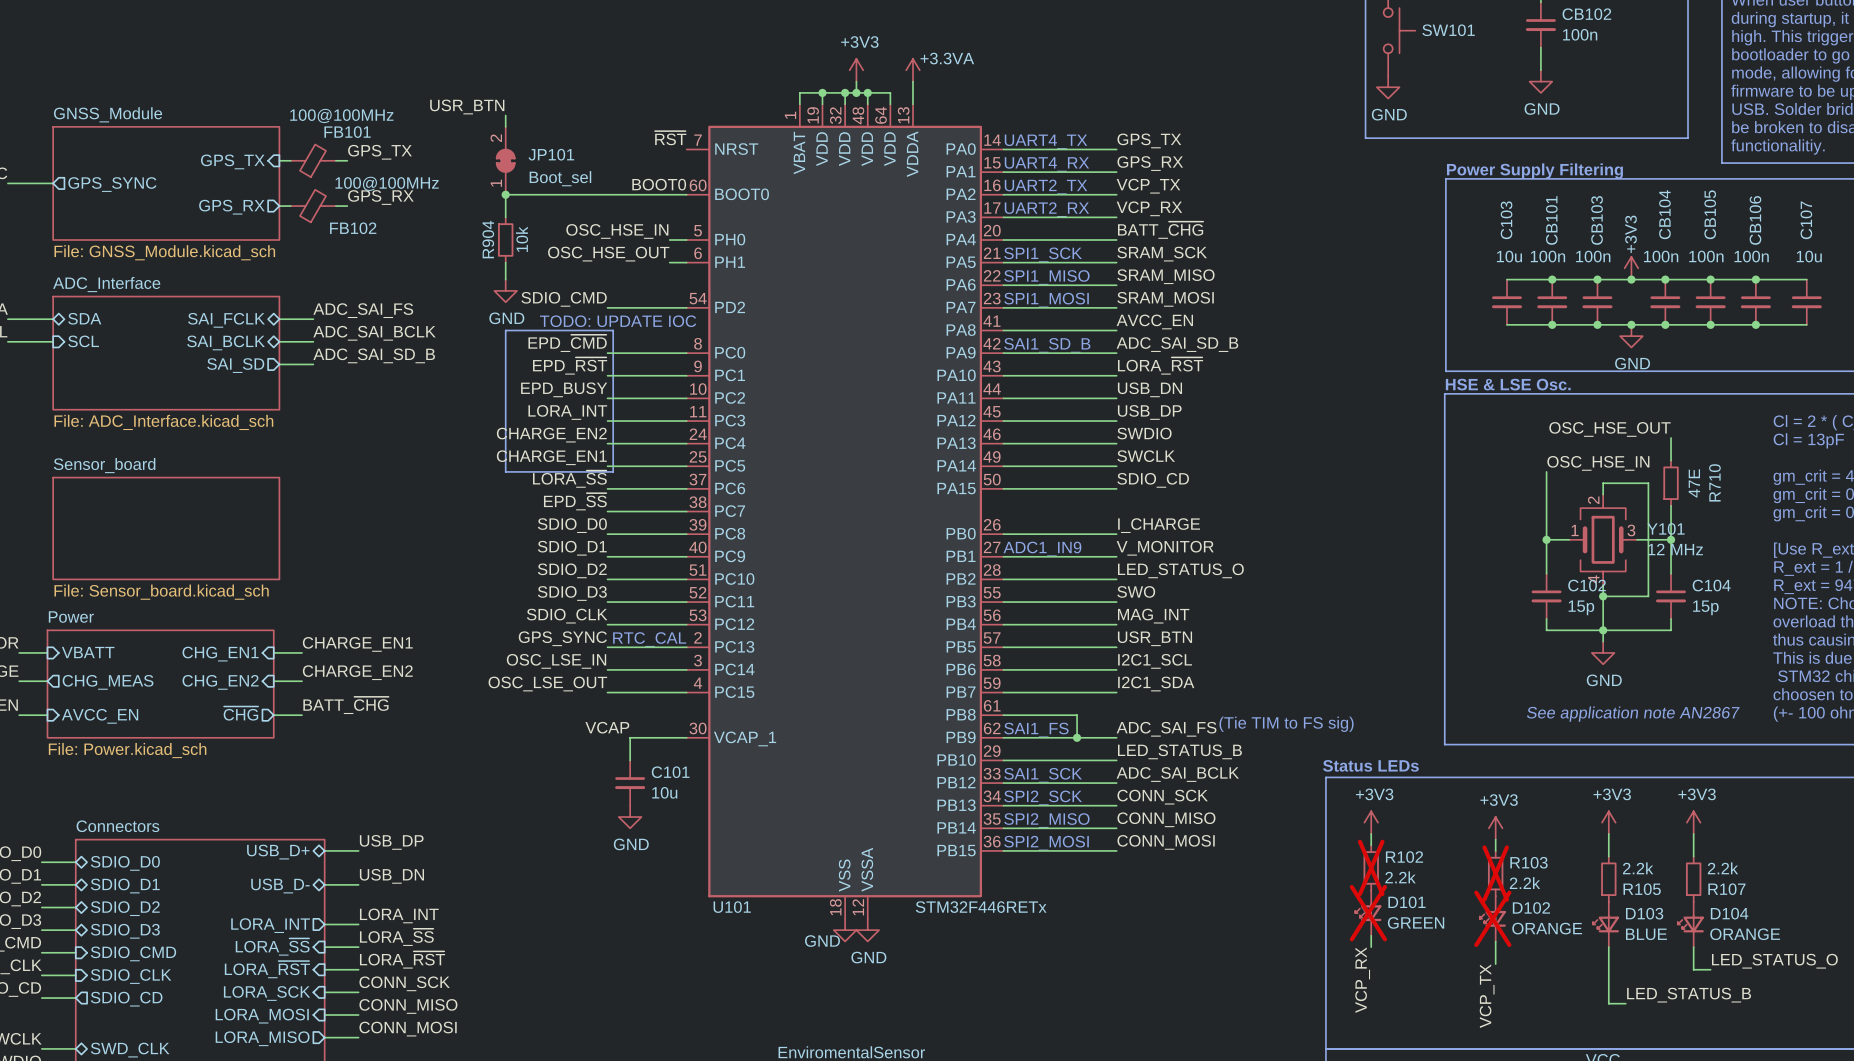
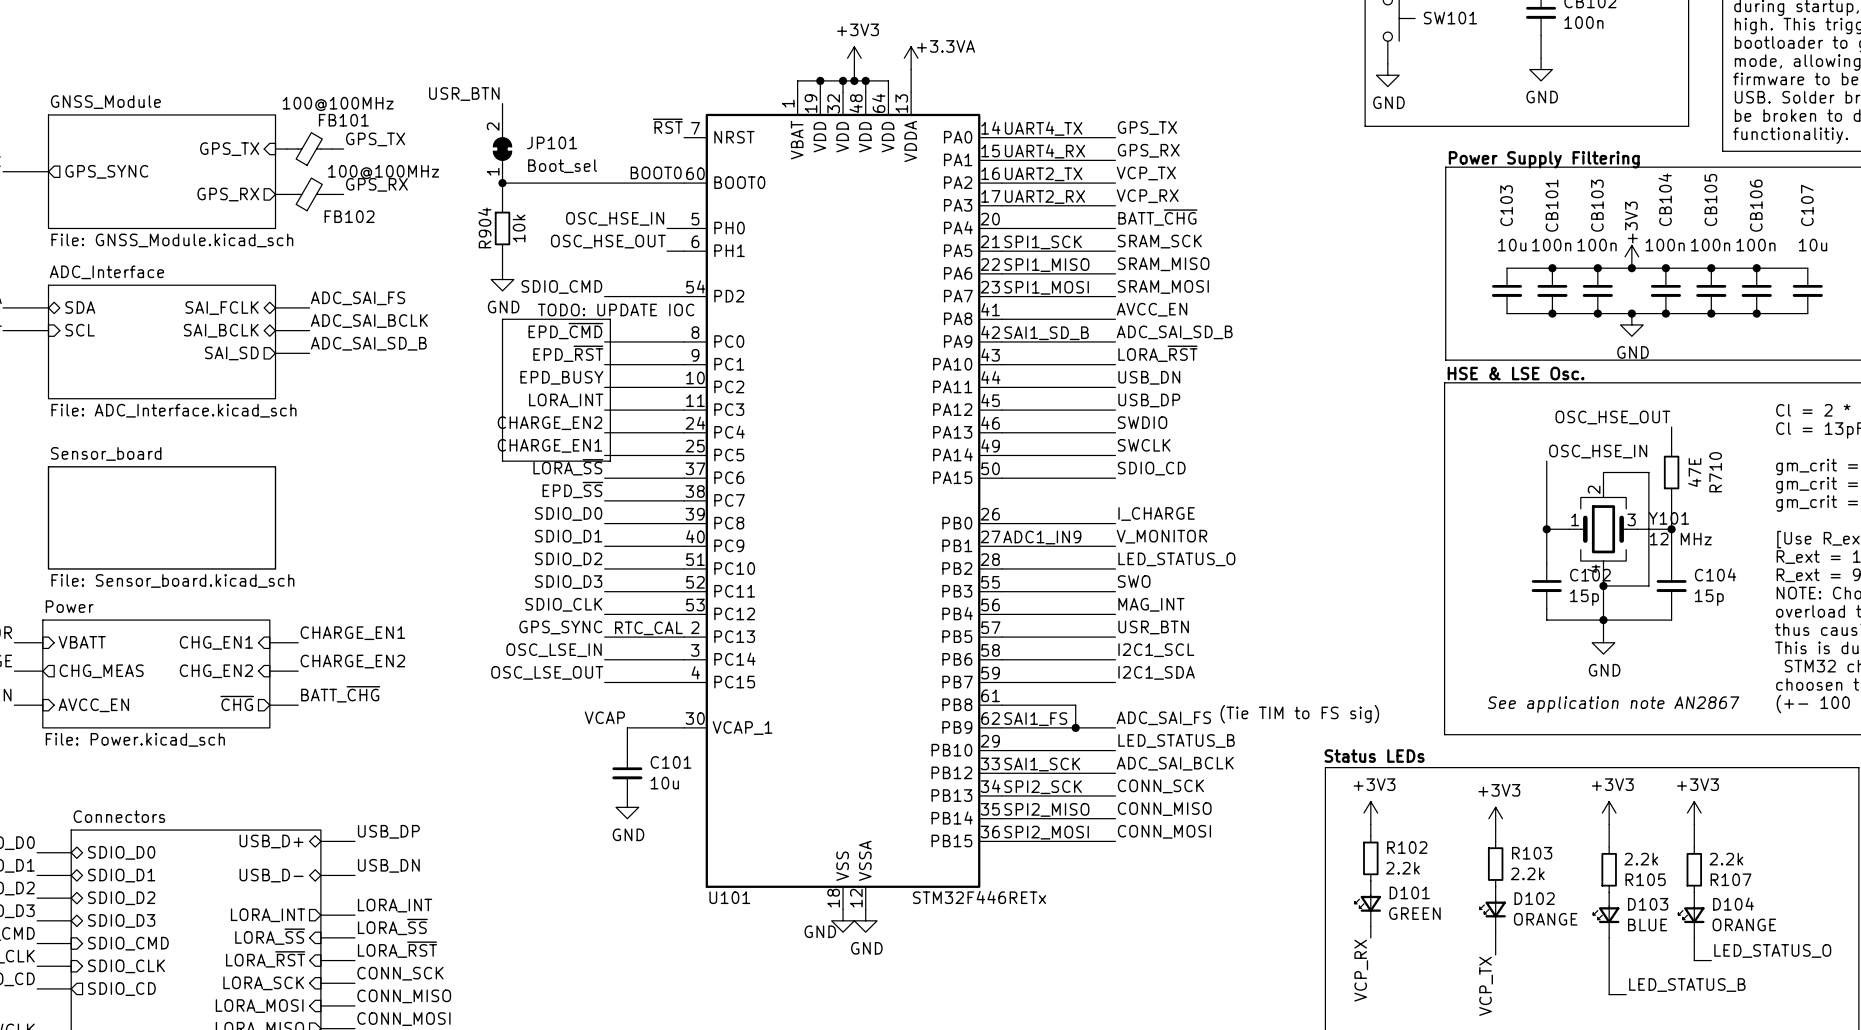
R102 do-not-place cross: (1371, 867) -> none
R103 do-not-place cross: (1495, 873) -> none
D101 do-not-place cross: (1368, 913) -> none
D102 do-not-place cross: (1492, 918) -> none

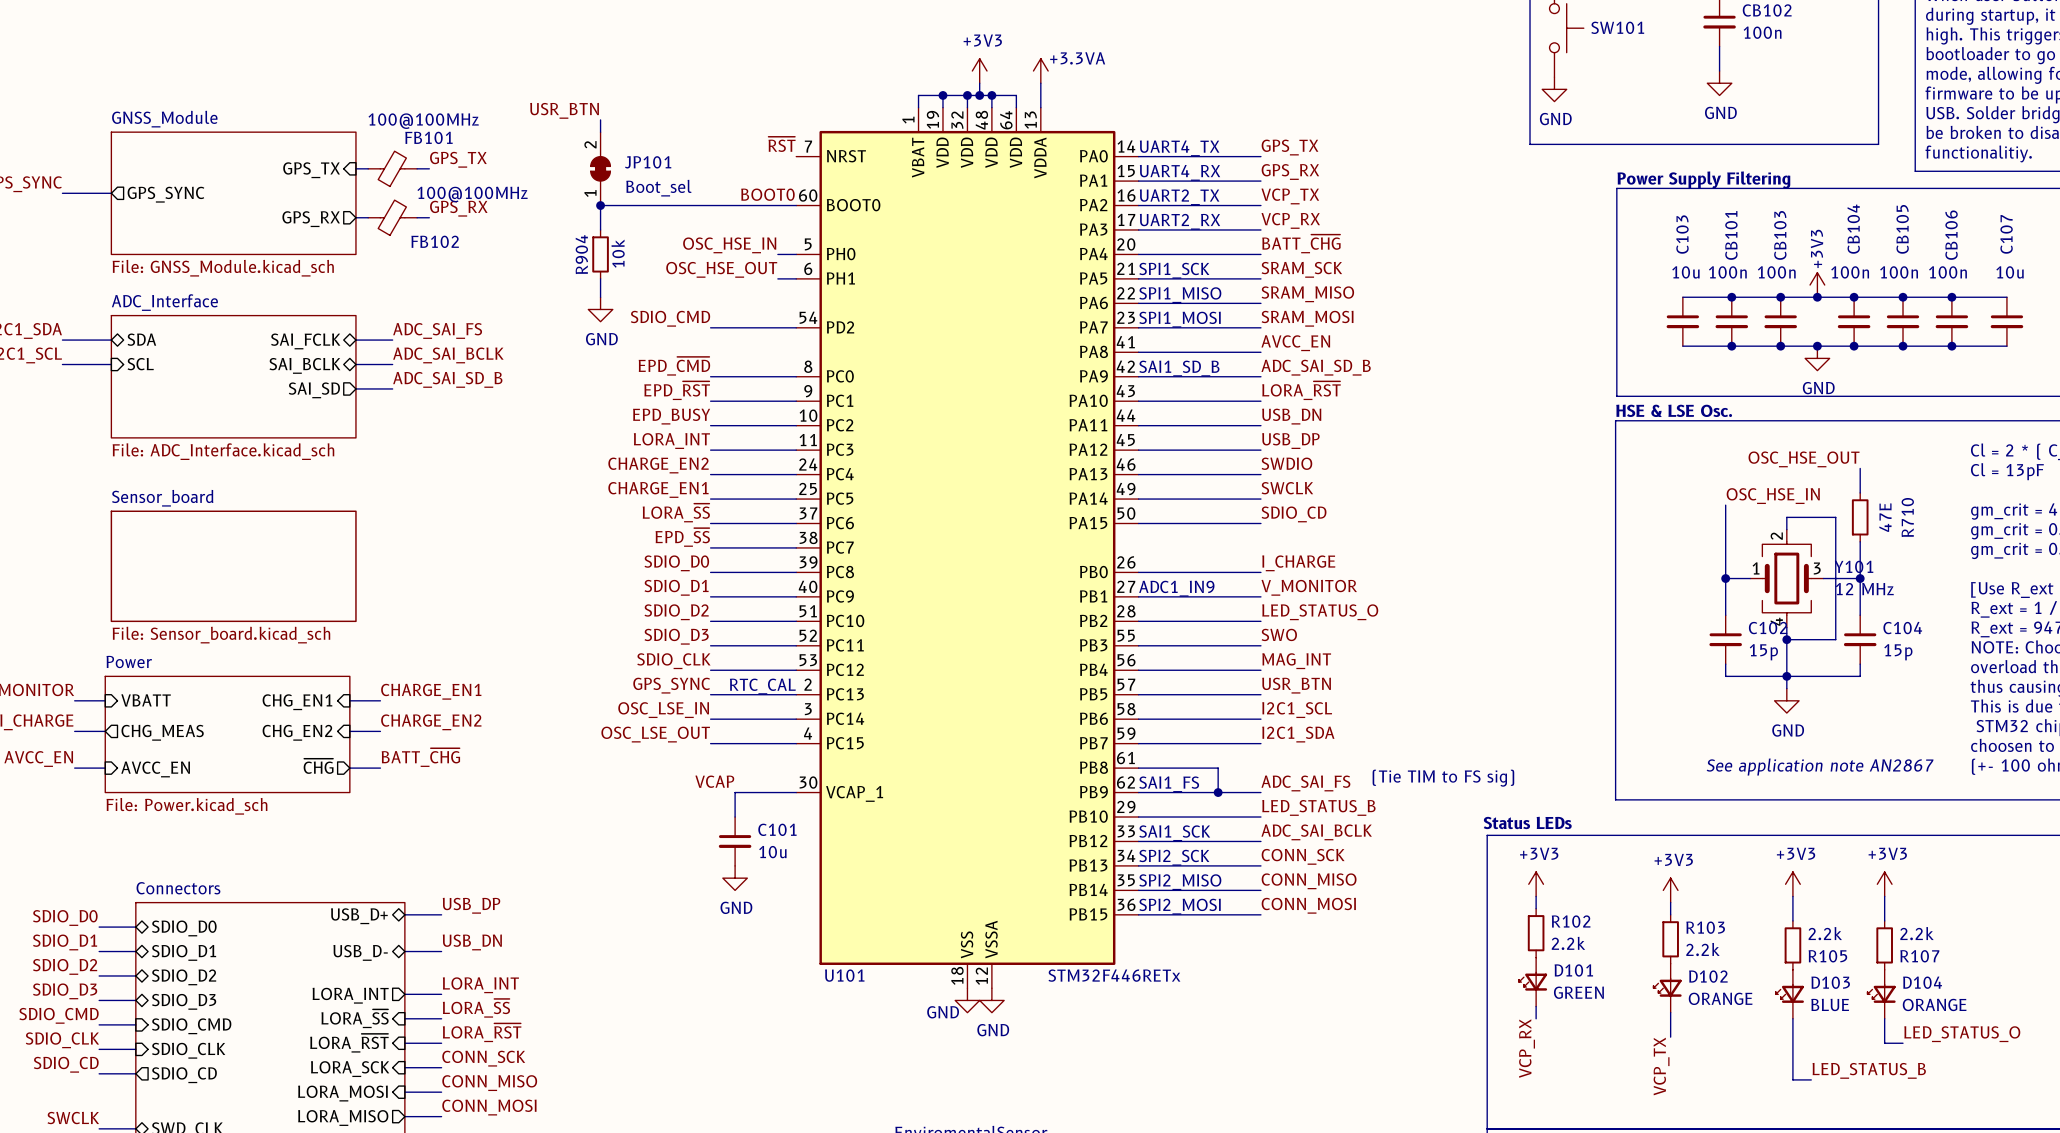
text: TODO: UPDATE IOC (616, 309) -> none
line: (502, 319) (610, 319) (610, 461) (502, 461) (502, 319) -> none

